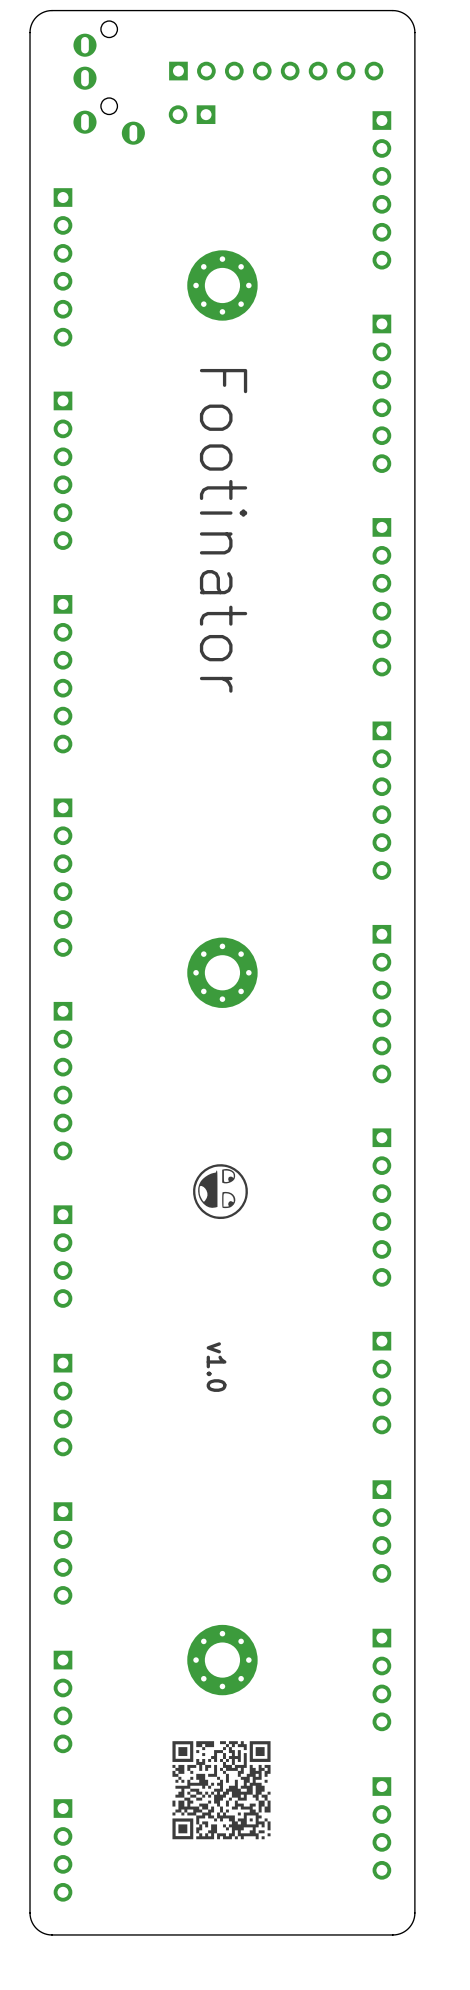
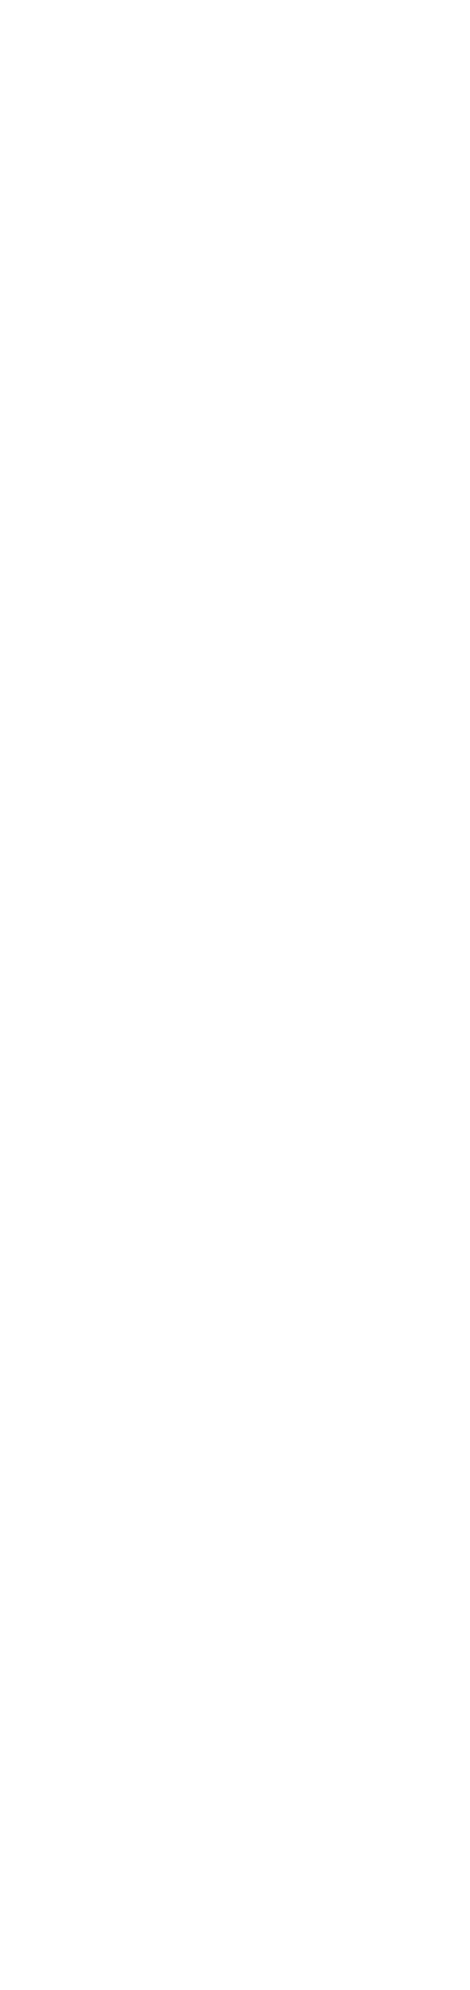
board edge: (392, 10) (52, 10) (38, 15) (30, 27) (30, 1912) (34, 1926) (47, 1934) (392, 1934) (406, 1930) (414, 1917) (414, 32) (412, 23) (408, 17) (400, 11) (392, 10) -> none
part: (276, 71) -> none
part: (109, 82) -> none
part: (192, 114) -> none
part: (381, 190) -> none
part: (62, 267) -> none
part: (222, 285) -> none
part: (381, 393) -> none
part: (62, 470) -> none
text: Footinator (223, 530) -> none
part: (381, 597) -> none
part: (62, 674) -> none
part: (381, 800) -> none
part: (62, 877) -> none
part: (222, 972) -> none
part: (381, 1004) -> none
part: (62, 1081) -> none
drawing: [193, 1164, 248, 1220] -> none
part: (381, 1207) -> none
part: (62, 1256) -> none
text: v1.0 (216, 1367) -> none
part: (381, 1383) -> none
part: (62, 1405) -> none
part: (381, 1531) -> none
part: (62, 1553) -> none
part: (222, 1660) -> none
part: (381, 1679) -> none
part: (62, 1701) -> none
drawing: [172, 1741, 271, 1840] -> none
part: (381, 1828) -> none
part: (62, 1850) -> none

